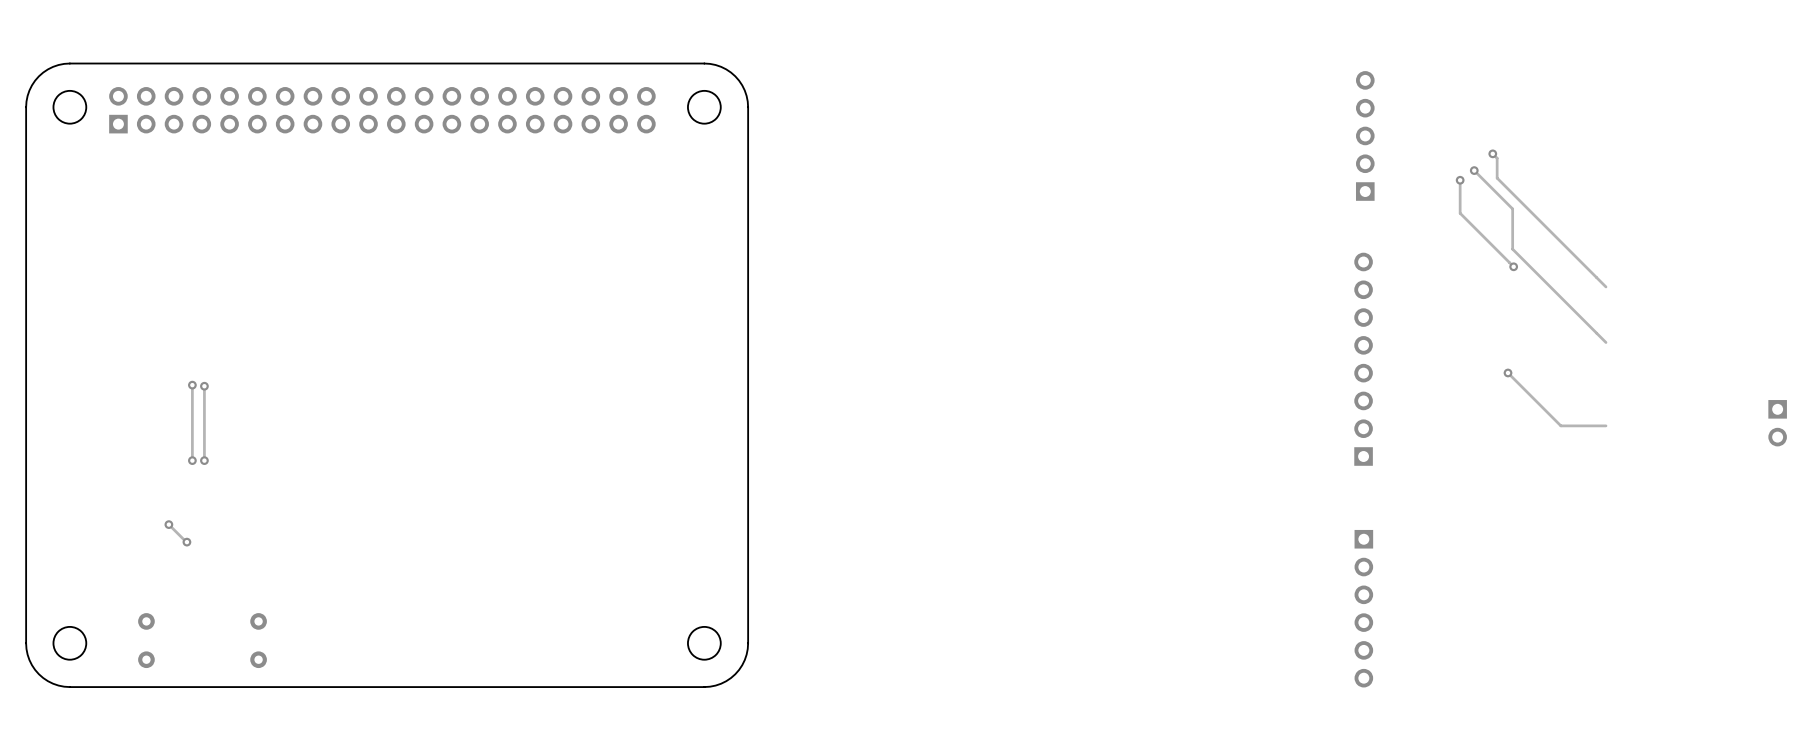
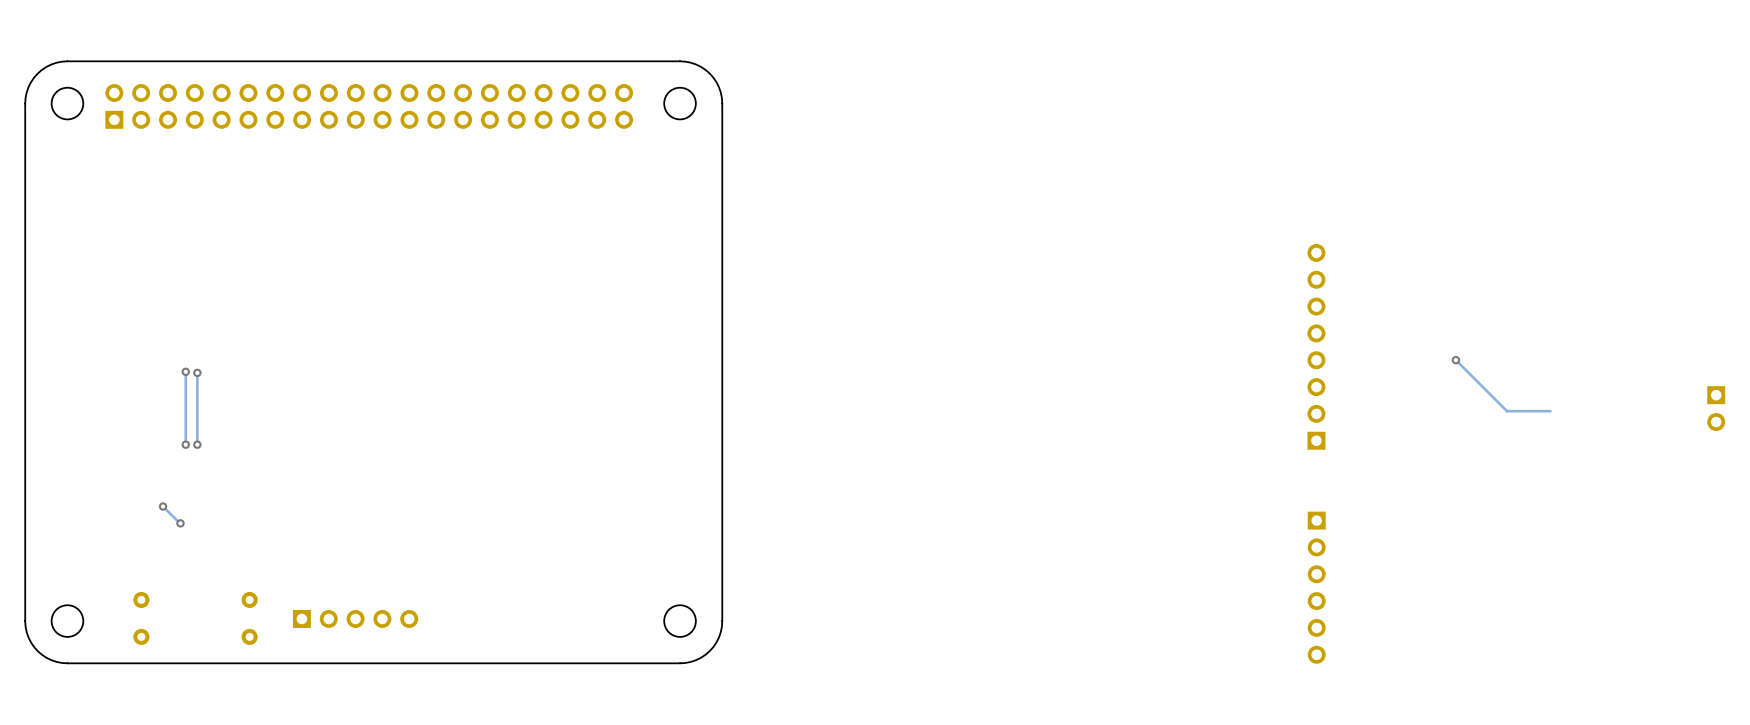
part: (1365, 135) -> none
track: (1492, 153) (1497, 158) (1497, 178) (1605, 286) -> none
via: (1492, 153) -> none
track: (1474, 170) (1512, 208) (1512, 249) (1605, 342) -> none
via: (1474, 170) -> none
track: (1460, 180) (1460, 213) (1513, 266) -> none
via: (1460, 180) -> none
via: (1513, 266) -> none
part: none -> (355, 618)

